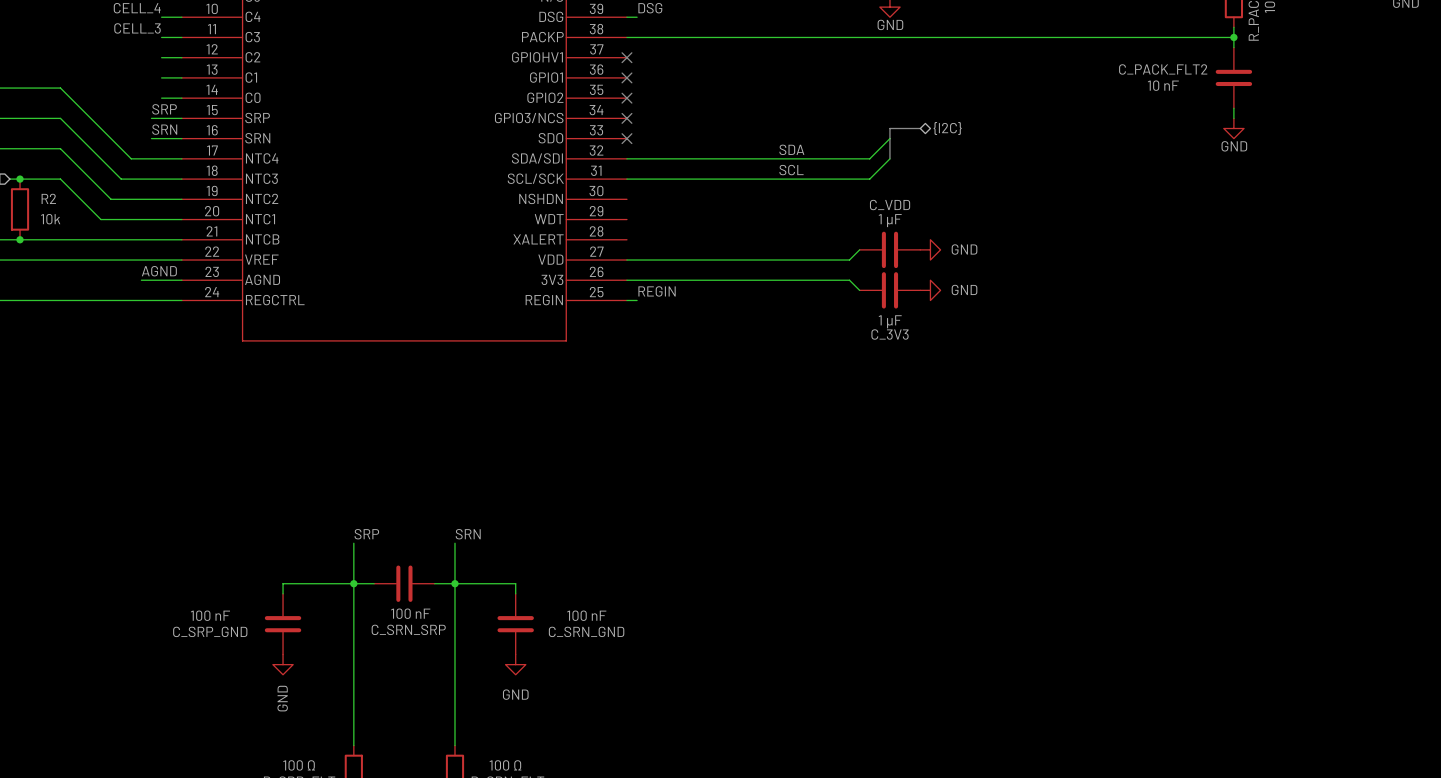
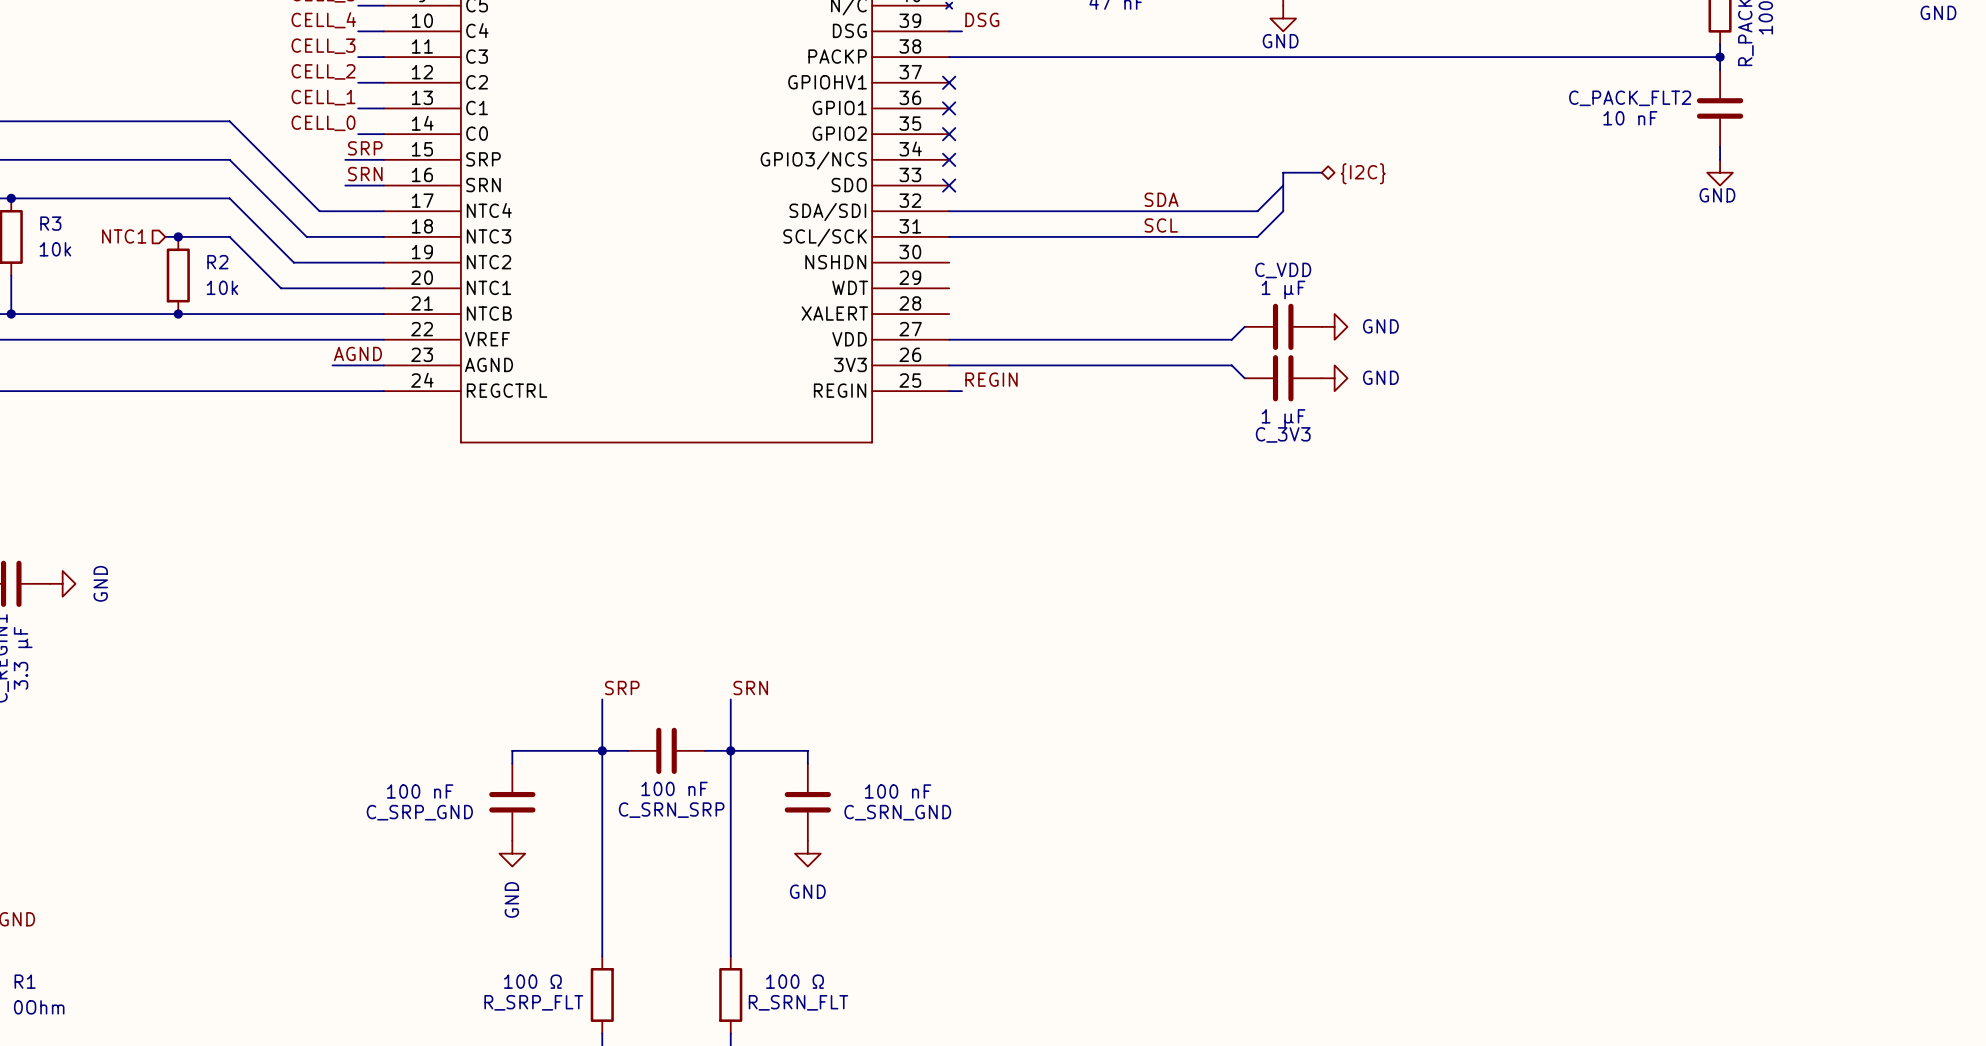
label: none -> CELL_2 (323, 71)
label: none -> CELL_1 (323, 97)
label: none -> CELL_0 (323, 123)

